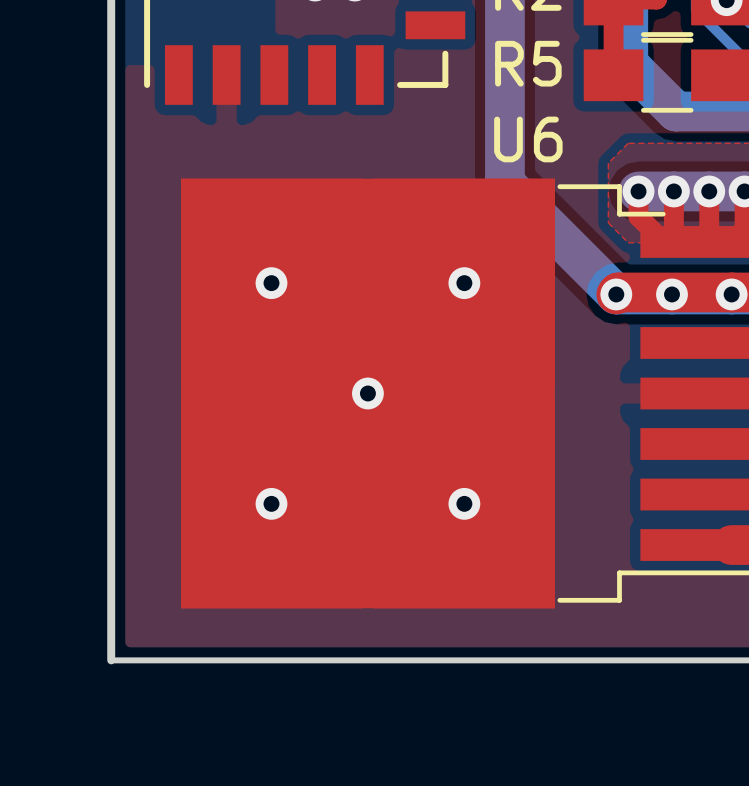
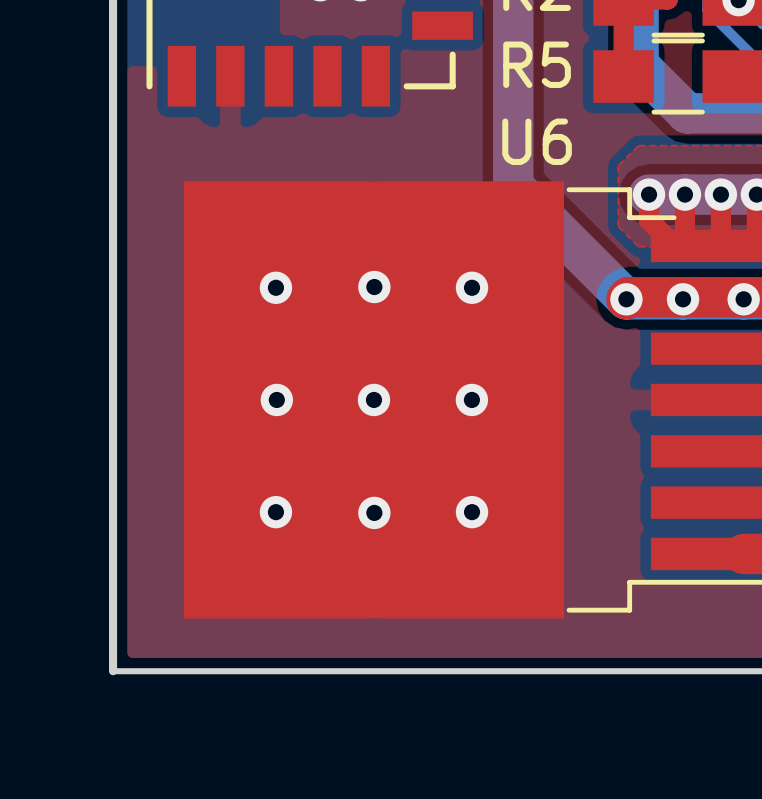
via: none -> (374, 287)
via: none -> (276, 399)
via: none -> (471, 399)
via: none -> (374, 512)

